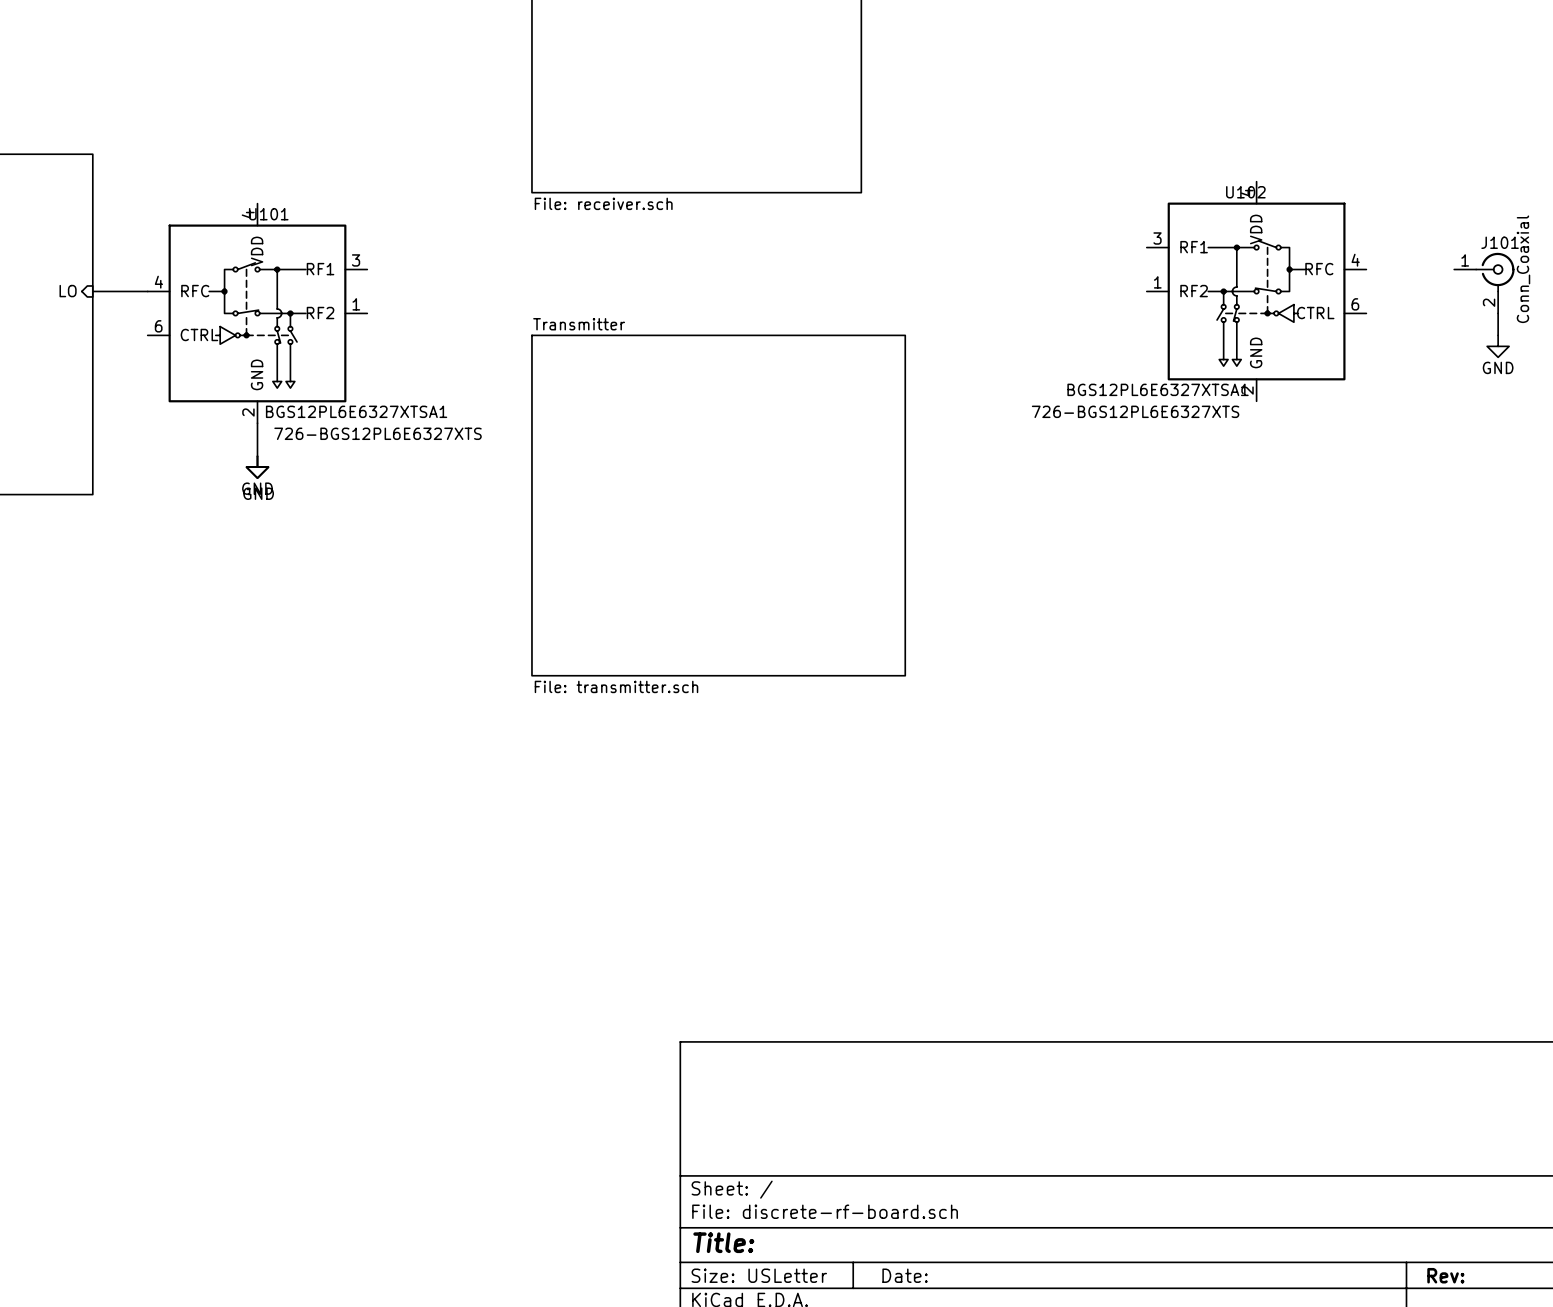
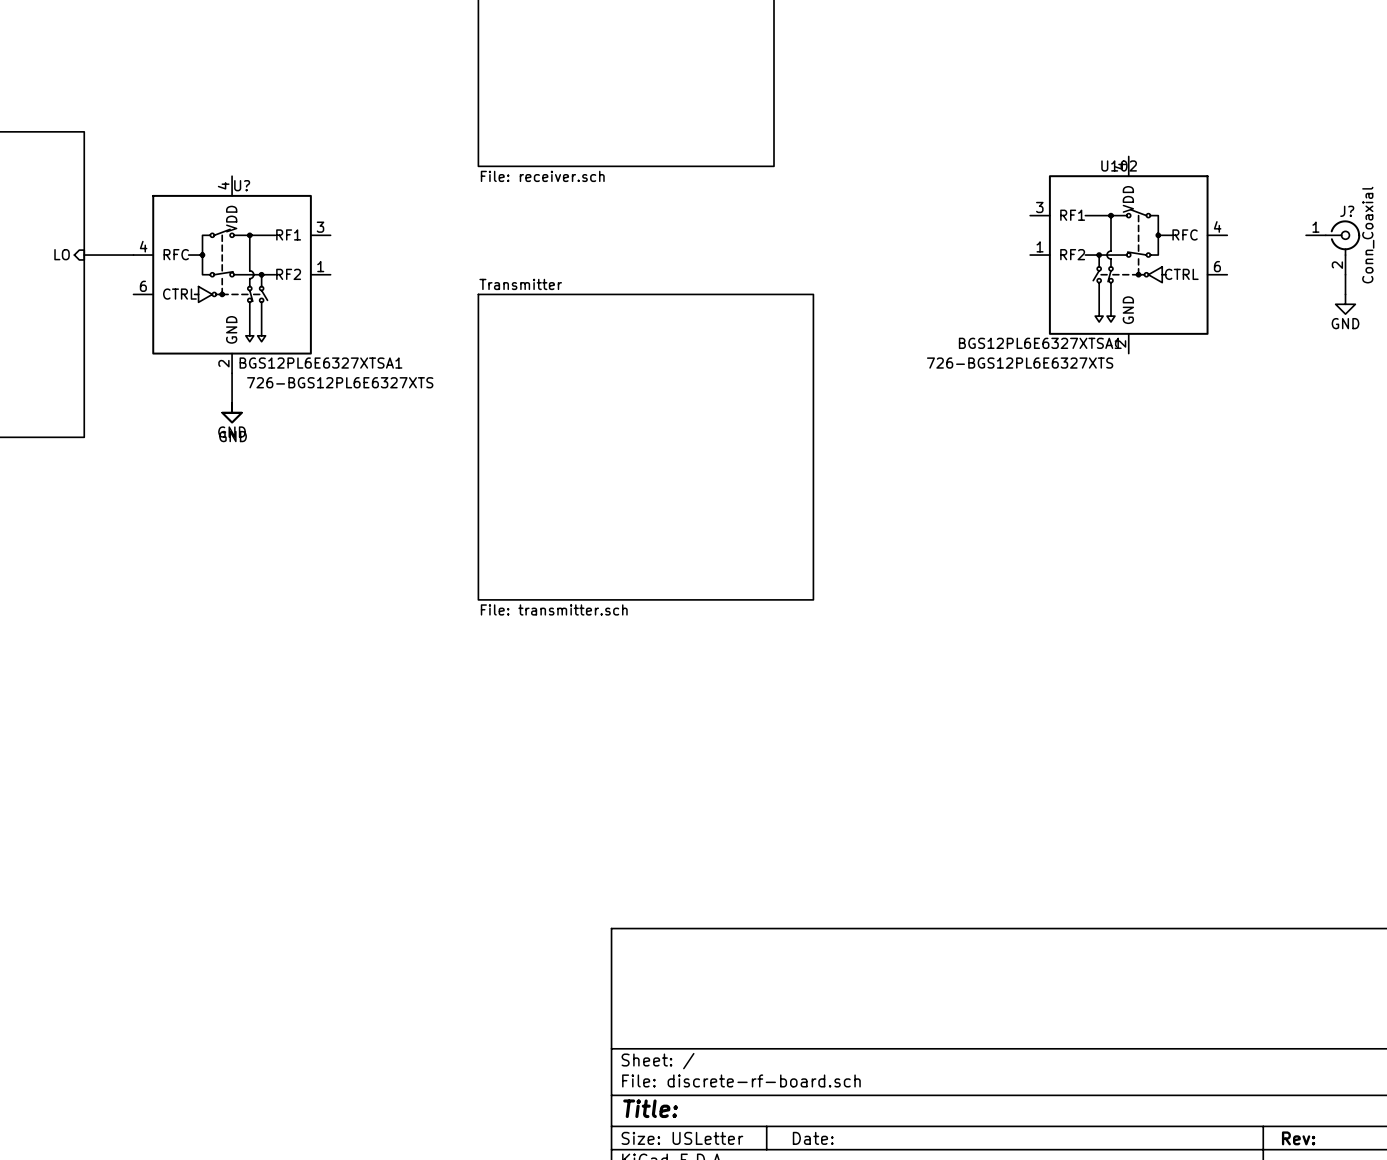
U101 name: U101 (268, 214) -> U? (242, 185)
J101 name: J101 (1500, 242) -> J? (1347, 211)

